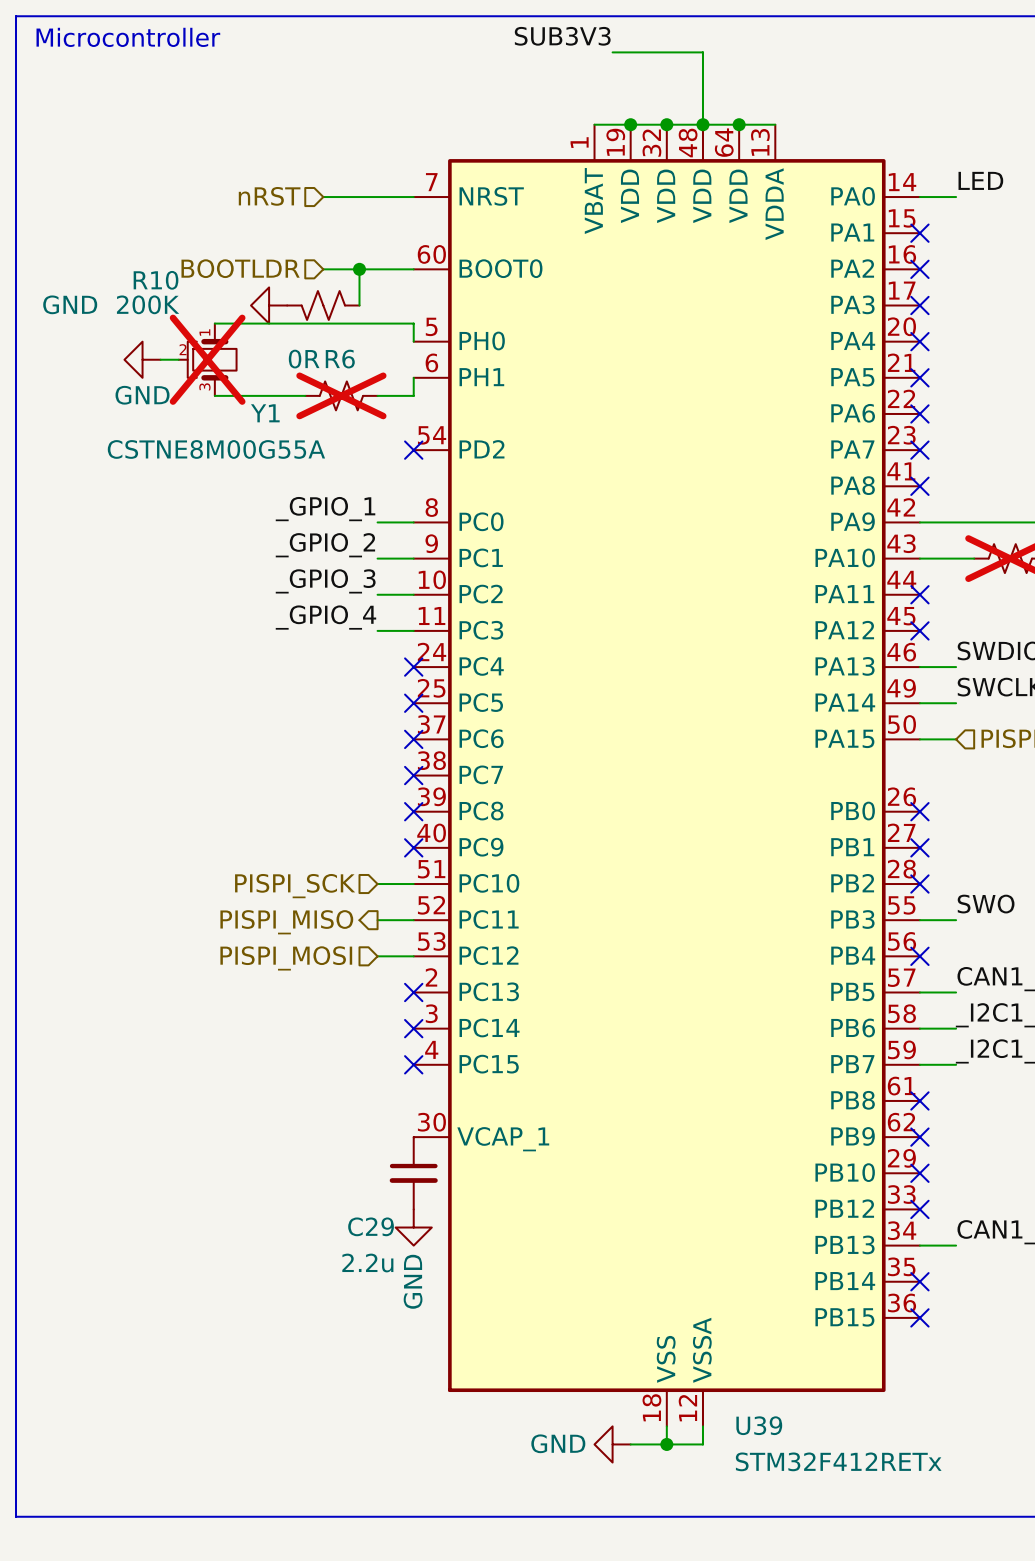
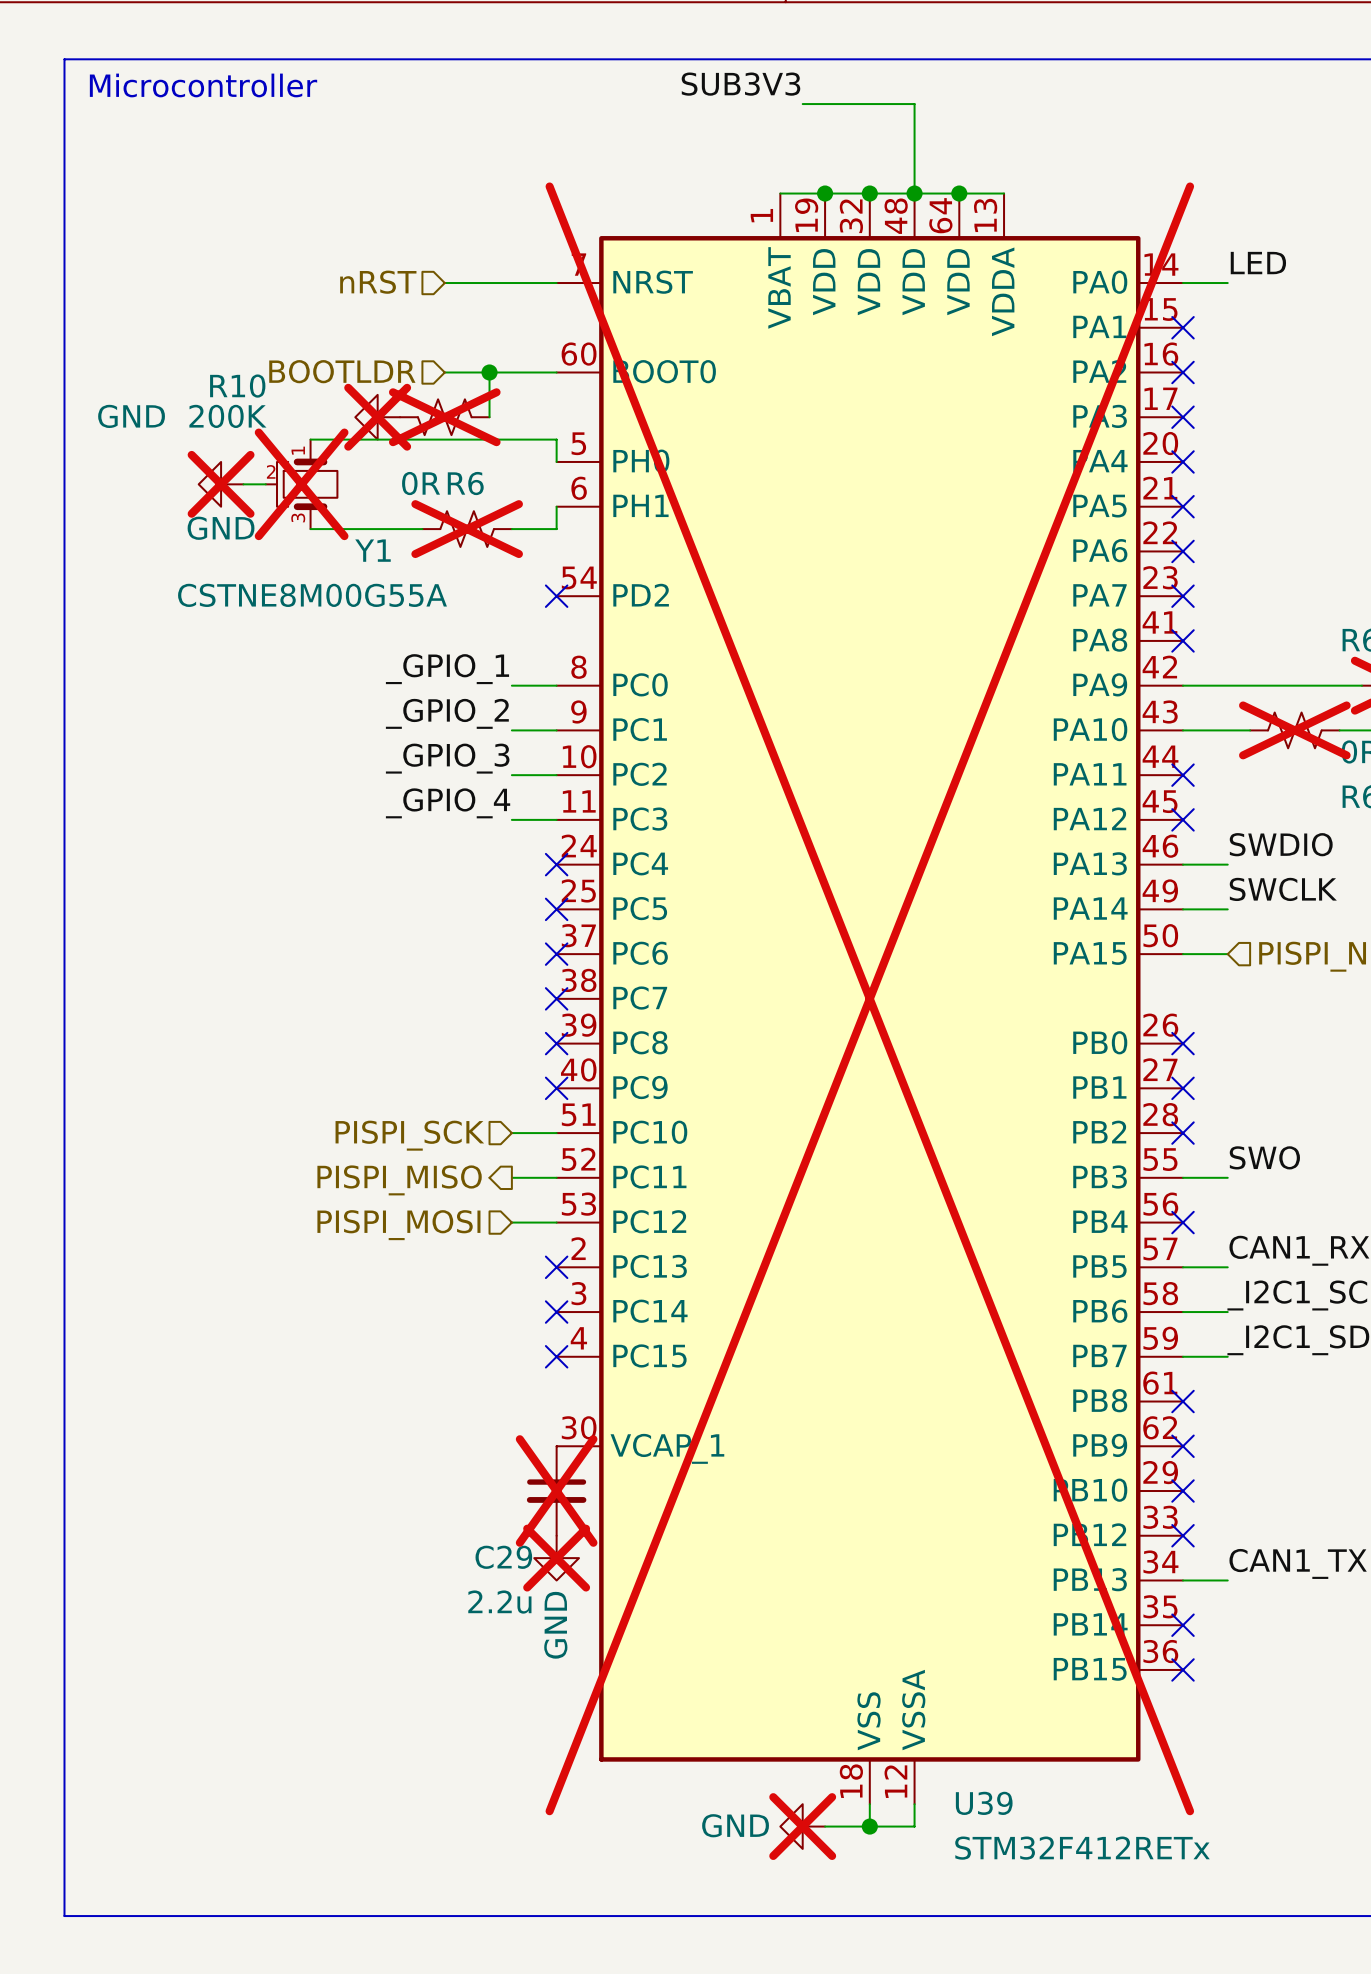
power symbol do-not-place cross: none -> (377, 417)
R10 do-not-place cross: none -> (444, 417)
power symbol do-not-place cross: none -> (221, 484)
U39 do-not-place cross: none -> (869, 998)
C29 do-not-place cross: none -> (556, 1491)
power symbol do-not-place cross: none -> (556, 1558)
power symbol do-not-place cross: none -> (802, 1826)

